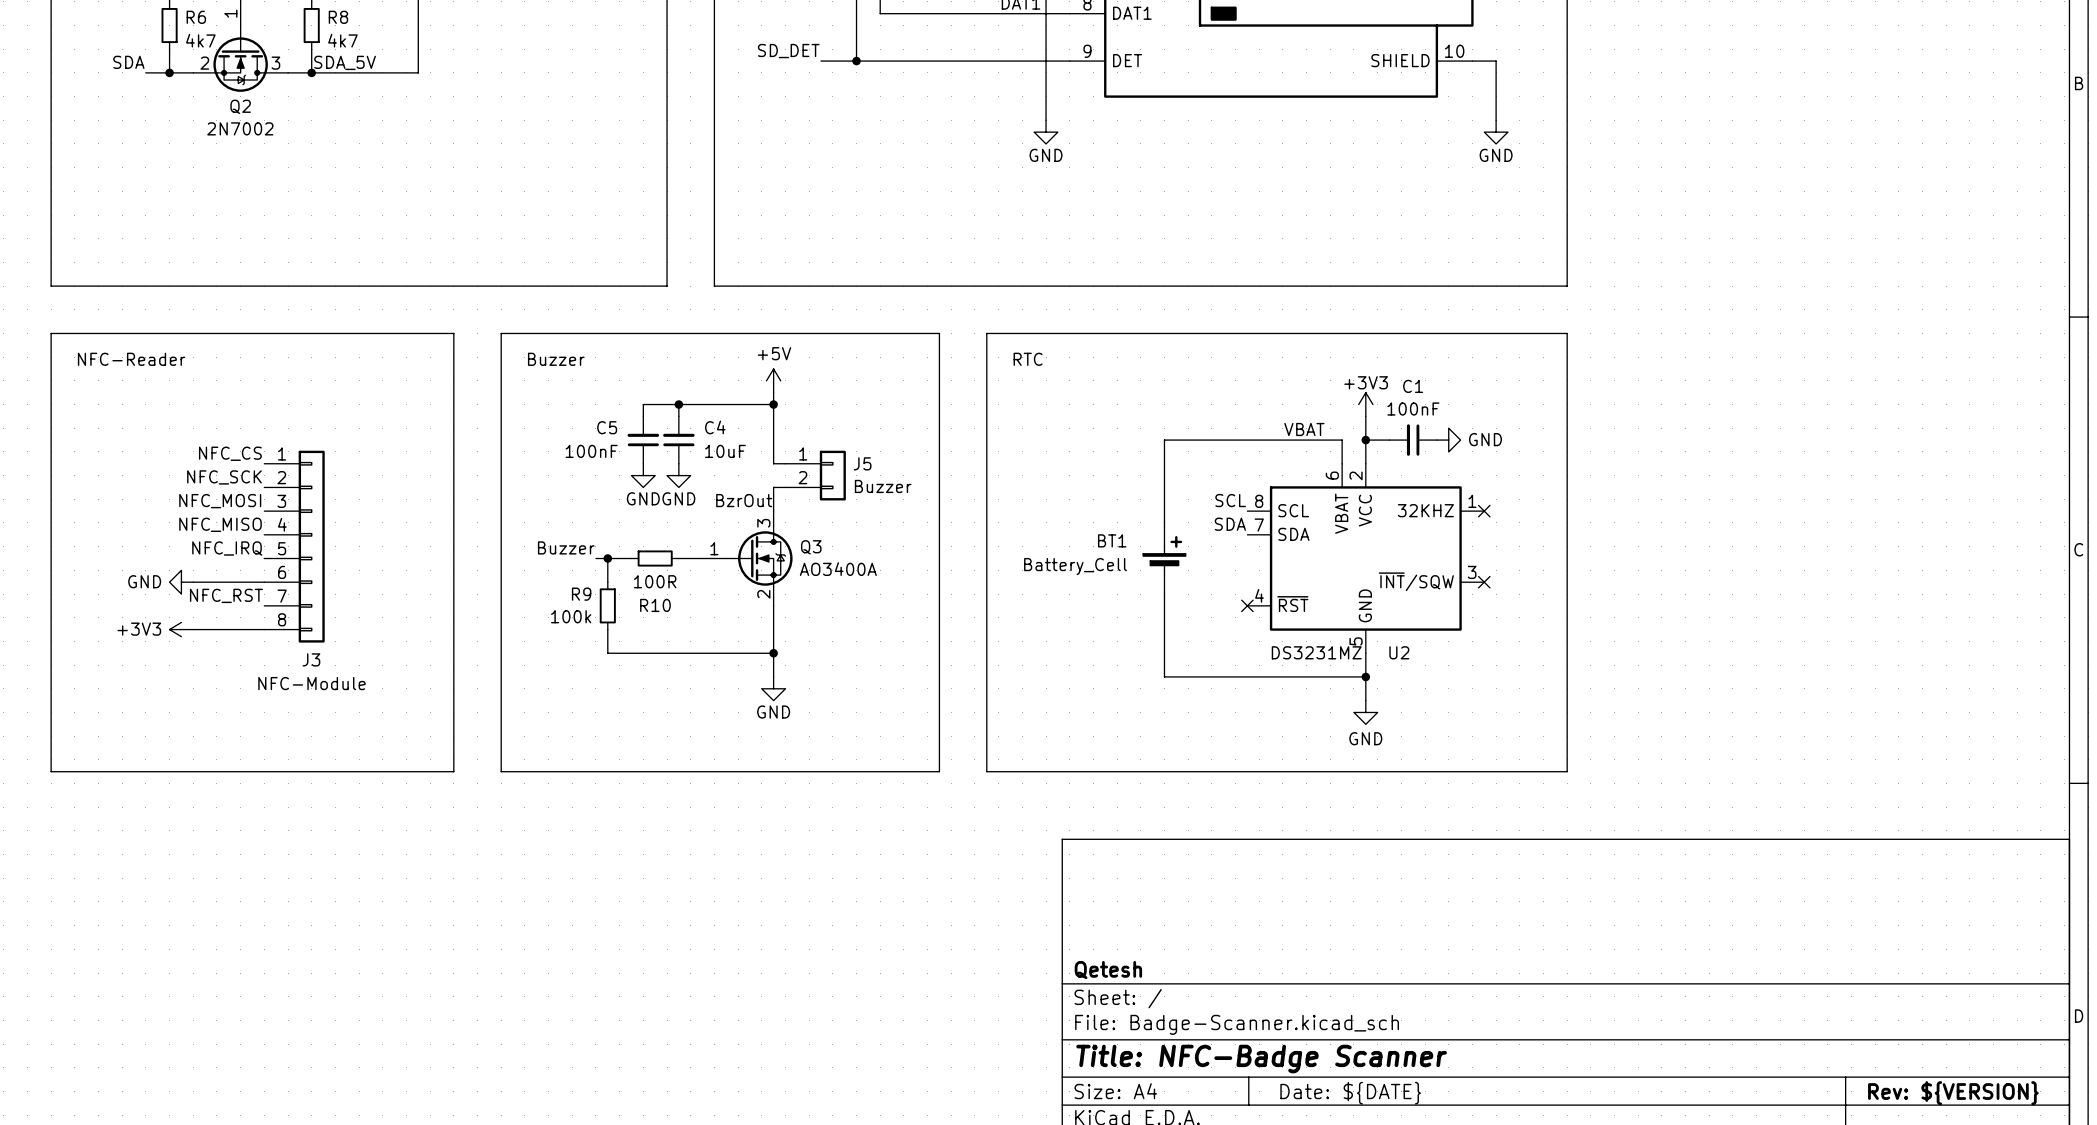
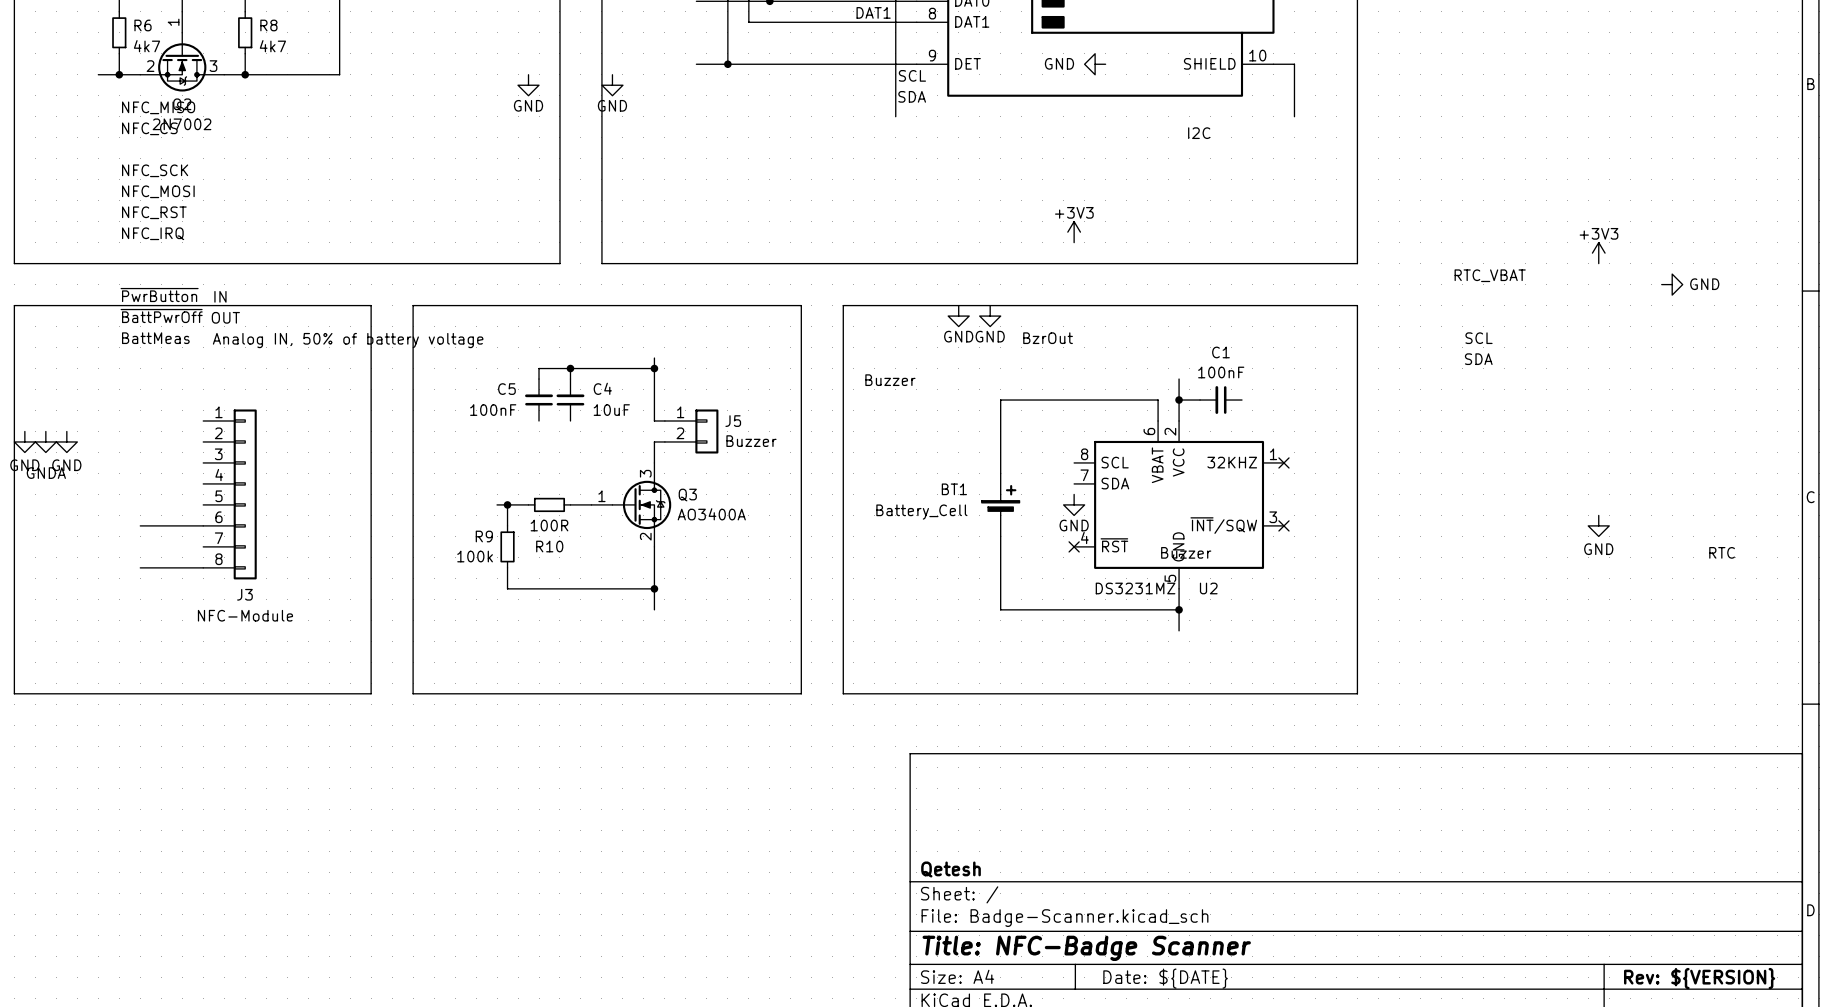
label: SD_DET (788, 51) -> none
power symbol: none -> GND (1095, 64)
label: SDA (128, 62) -> none
label: SDA_5V (345, 62) -> none
label: none -> SCL (912, 75)
power symbol: none -> GND (528, 85)
power symbol: none -> GND (612, 85)
label: none -> SDA (912, 96)
label: none -> NFC_MISO (158, 107)
power symbol: GND (1046, 132) -> none
power symbol: GND (1496, 132) -> none
label: none -> NFC_CS (149, 128)
text: none -> I2C (1199, 133)
label: none -> NFC_SCK (155, 170)
label: none -> NFC_MOSI (158, 191)
label: none -> NFC_RST (154, 212)
label: none -> NFC_IRQ (153, 233)
power symbol: none -> +3V3 (1598, 253)
label: none -> RTC_VBAT (1490, 275)
power symbol: none -> GND (1672, 284)
label: none -> ~{PwrButton} (159, 295)
text: none -> IN (220, 296)
label: none -> ~{BattPwrOff} (161, 315)
power symbol: none -> GND (958, 316)
power symbol: none -> GND (990, 316)
text: none -> OUT (225, 317)
text: NFC-Reader (131, 359) -> none
text: Buzzer (556, 359) -> none
text: RTC (1028, 359) -> none
label: none -> BattMeas (155, 338)
label: none -> BzrOut (1048, 338)
label: none -> SCL (1479, 338)
text: none -> Analog IN, 50% of battery voltage (348, 340)
power symbol: +5V (773, 380) -> none
label: none -> SDA (1478, 359)
power symbol position: +3V3 (1365, 404) -> +3V3 (1074, 232)
label: none -> Buzzer (890, 380)
label: VBAT (1304, 429) -> none
power symbol: GND (1448, 440) -> none
label: NFC_CS (230, 453) -> none
power symbol: GND (643, 475) -> none
power symbol: GND (678, 475) -> none
label: NFC_SCK (224, 477) -> none
power symbol: none -> GND (24, 441)
power symbol: none -> GNDA (45, 441)
power symbol: none -> GND (66, 441)
label: BzrOut (744, 500) -> none
label: SCL (1230, 500) -> none
label: NFC_MOSI (220, 501) -> none
label: NFC_MISO (220, 524) -> none
label: SDA (1230, 524) -> none
label: Buzzer (566, 547) -> none
label: NFC_IRQ (227, 548) -> none
power symbol: none -> GND (1074, 504)
power symbol: GND (181, 582) -> none
power symbol: none -> GND (1598, 525)
label: NFC_RST (226, 595) -> none
text: none -> Buzzer (1186, 552)
text: none -> RTC (1722, 552)
power symbol: +3V3 (181, 629) -> none
power symbol: GND (773, 688) -> none
power symbol: GND (1365, 712) -> none

